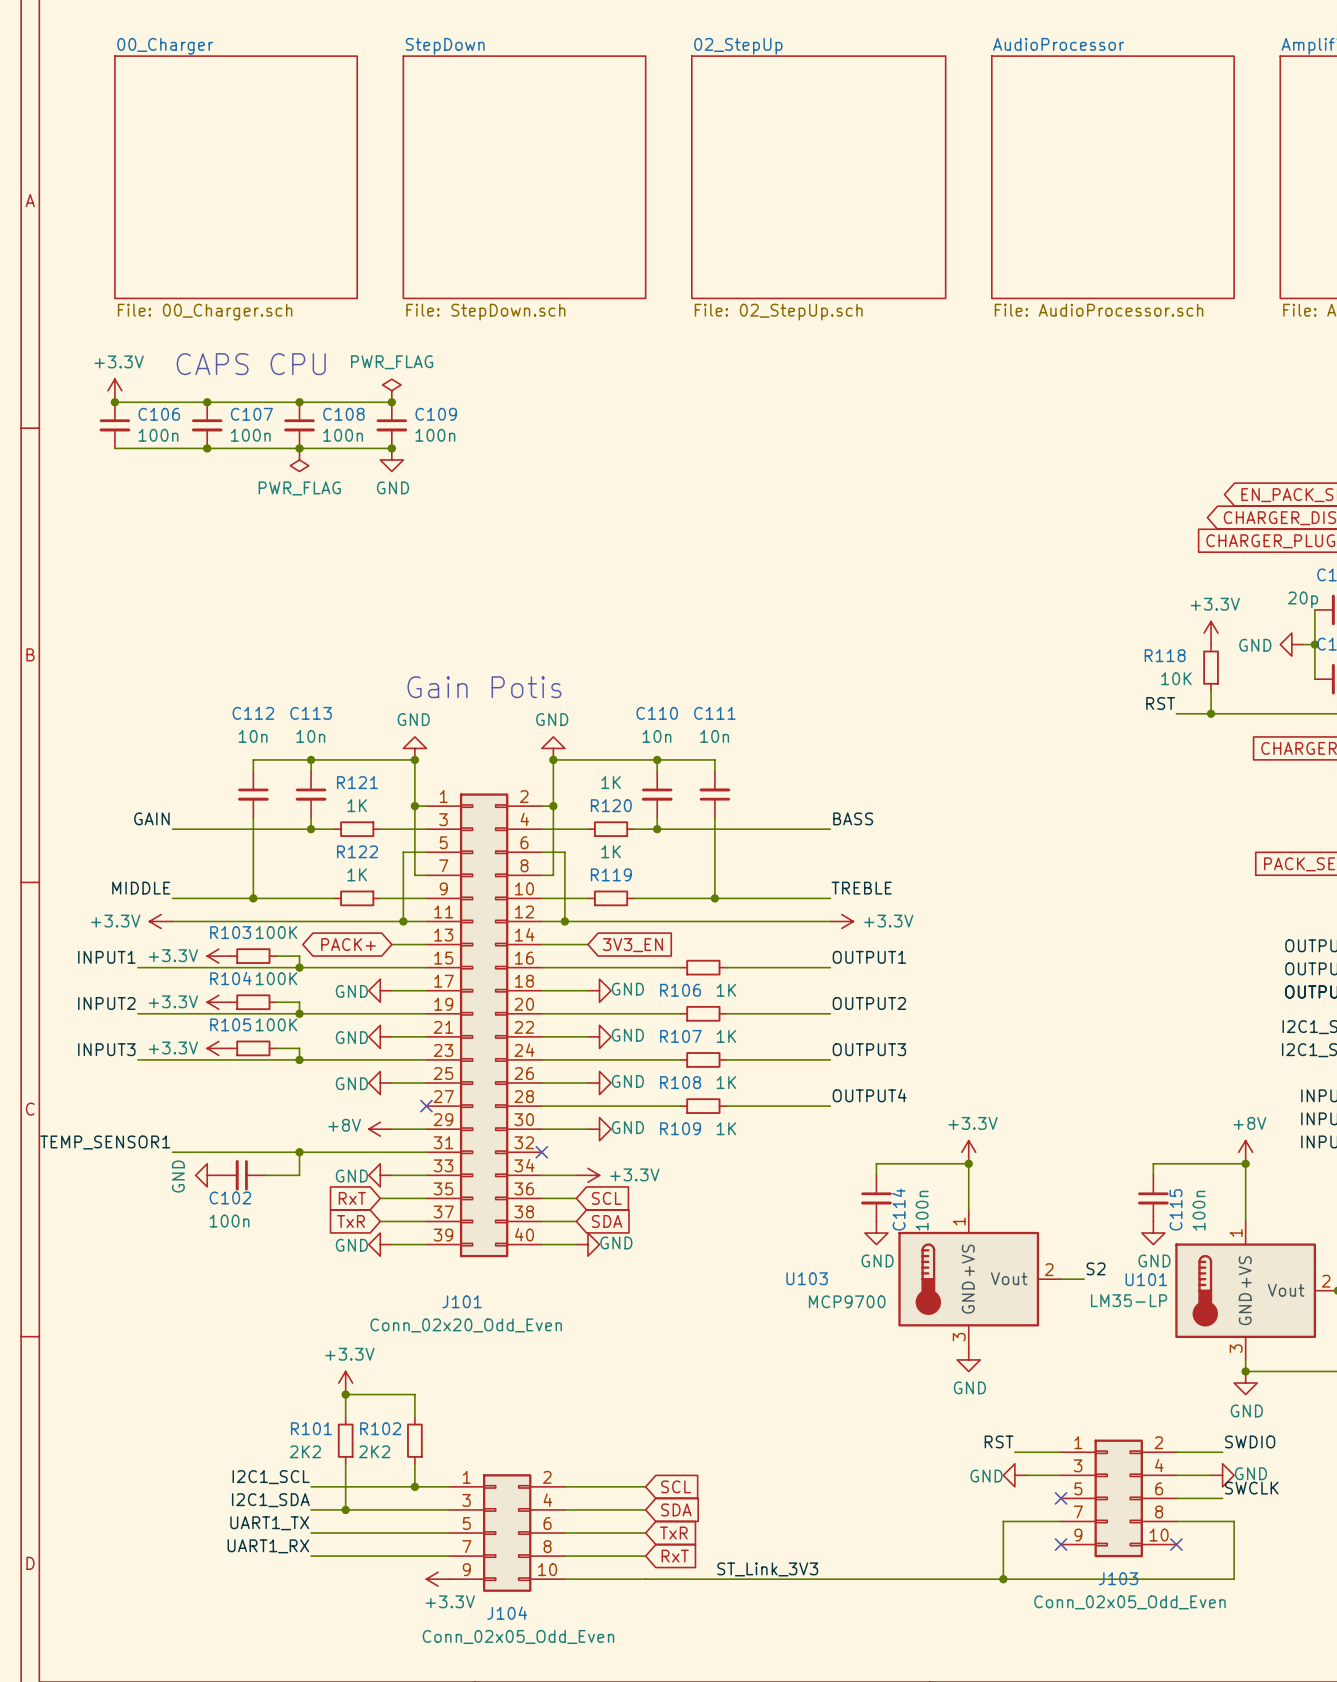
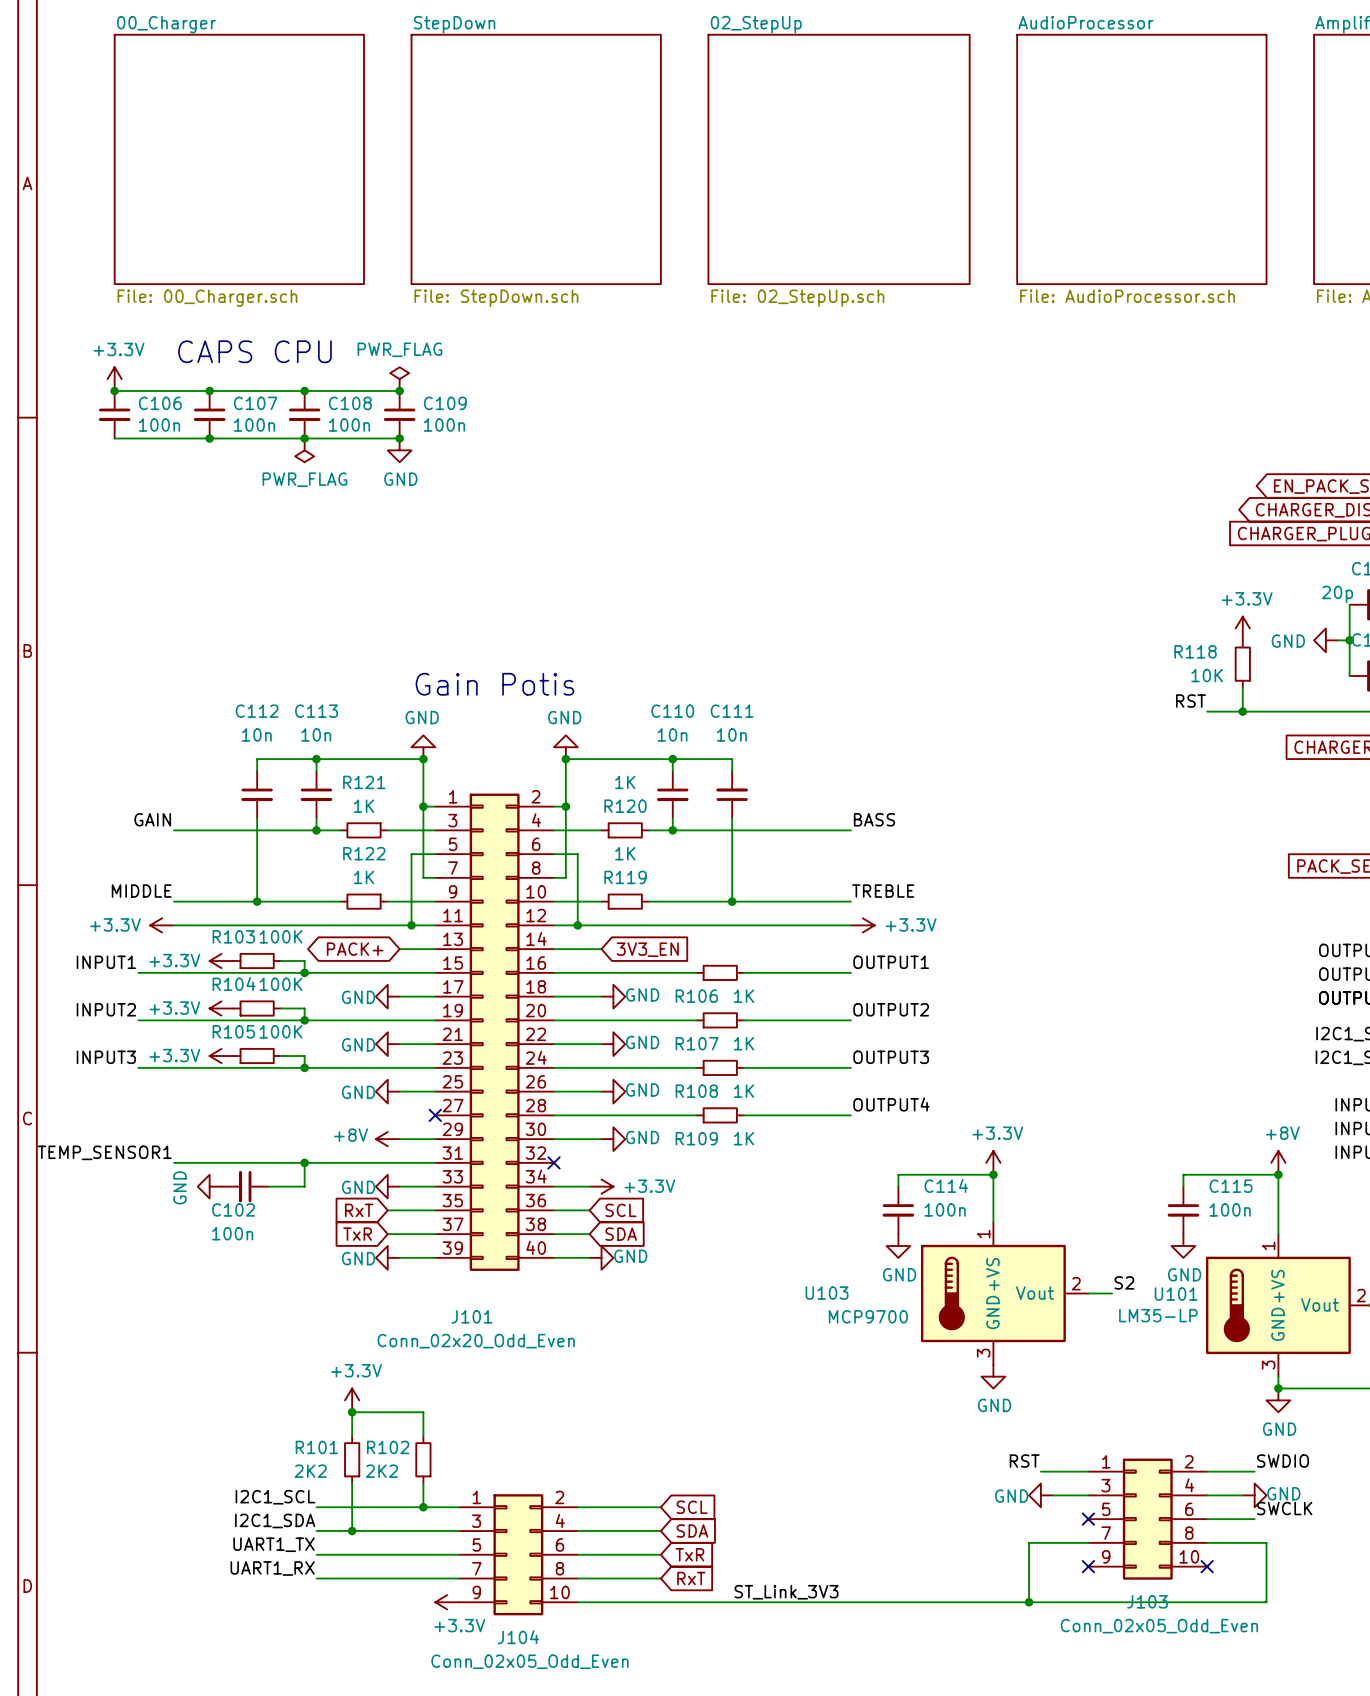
C114 name rotation: 0° (898, 1209) -> 90° clockwise (946, 1185)
C115 name rotation: 0° (1175, 1209) -> 90° clockwise (1231, 1186)
C114 value rotation: 0° (922, 1210) -> 90° clockwise (945, 1209)
C115 value rotation: 0° (1199, 1210) -> 90° clockwise (1230, 1209)

